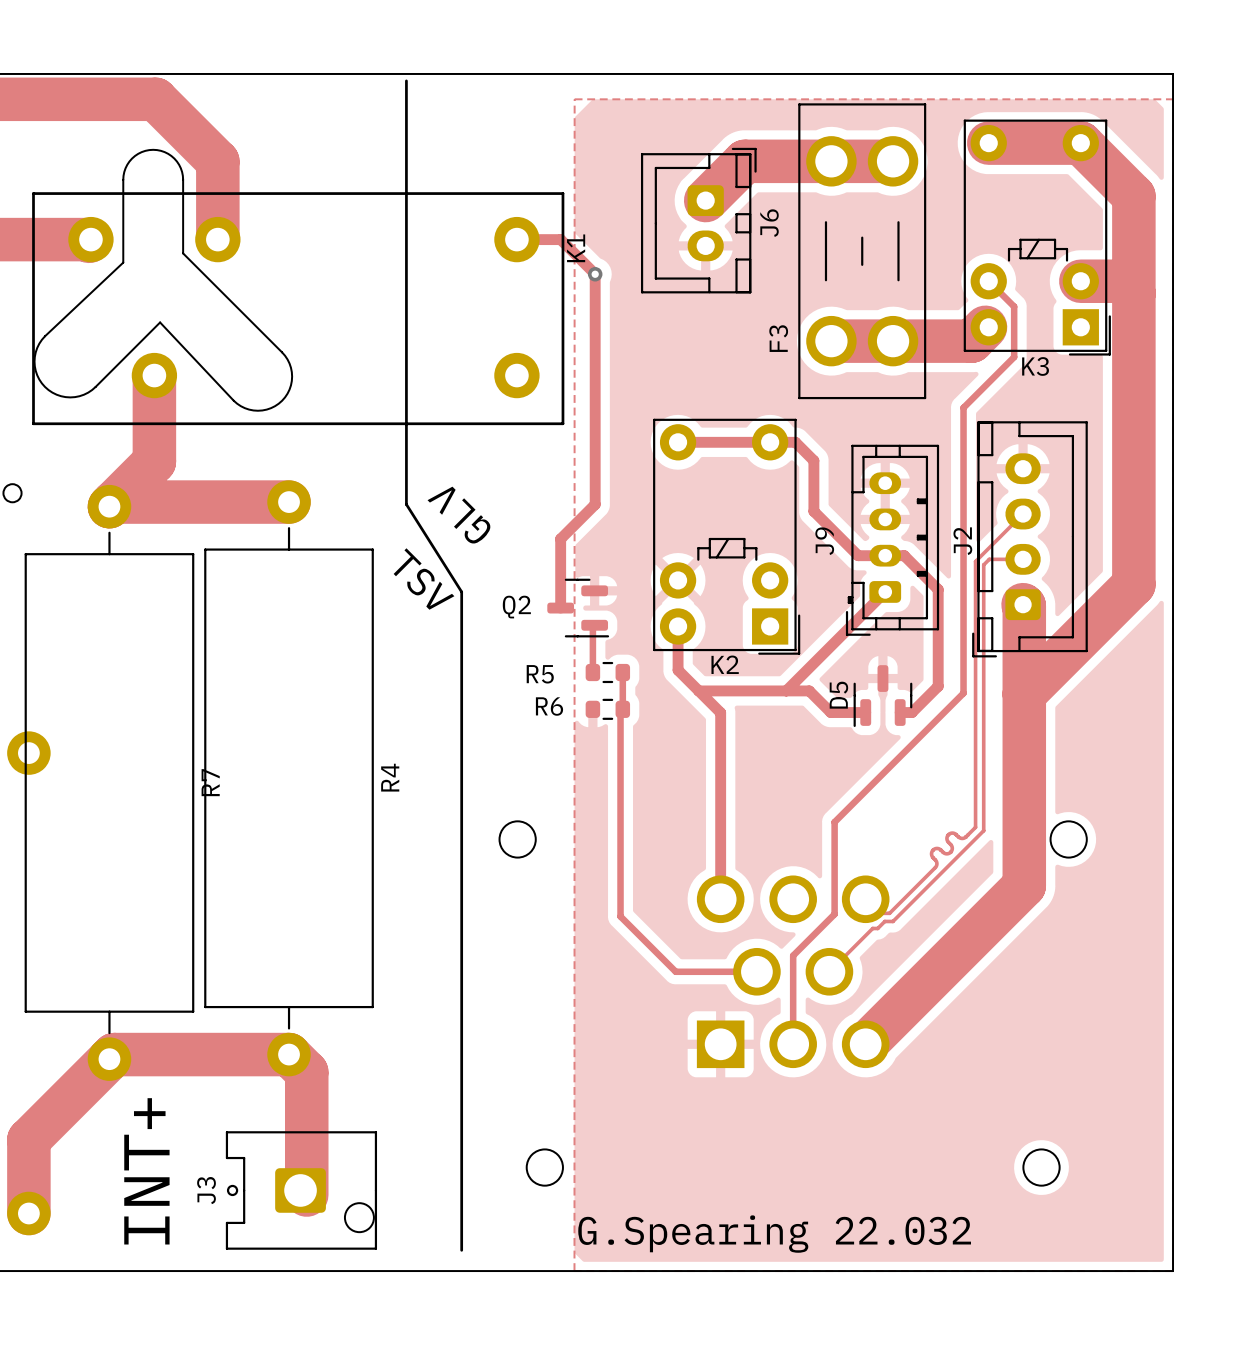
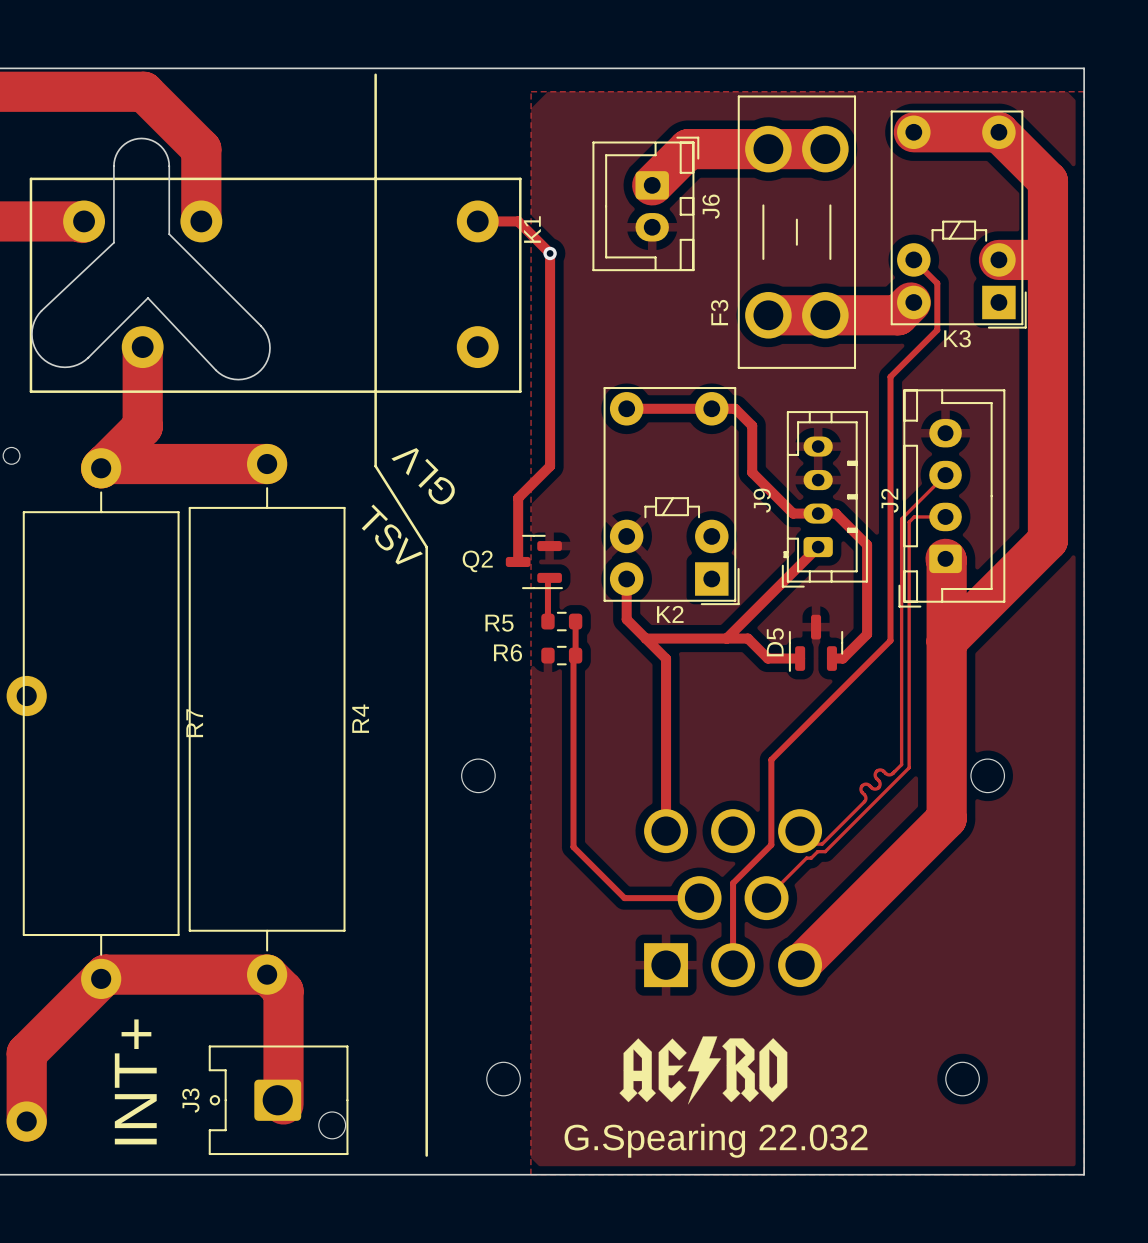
drawing: none -> [619, 1036, 788, 1105]

